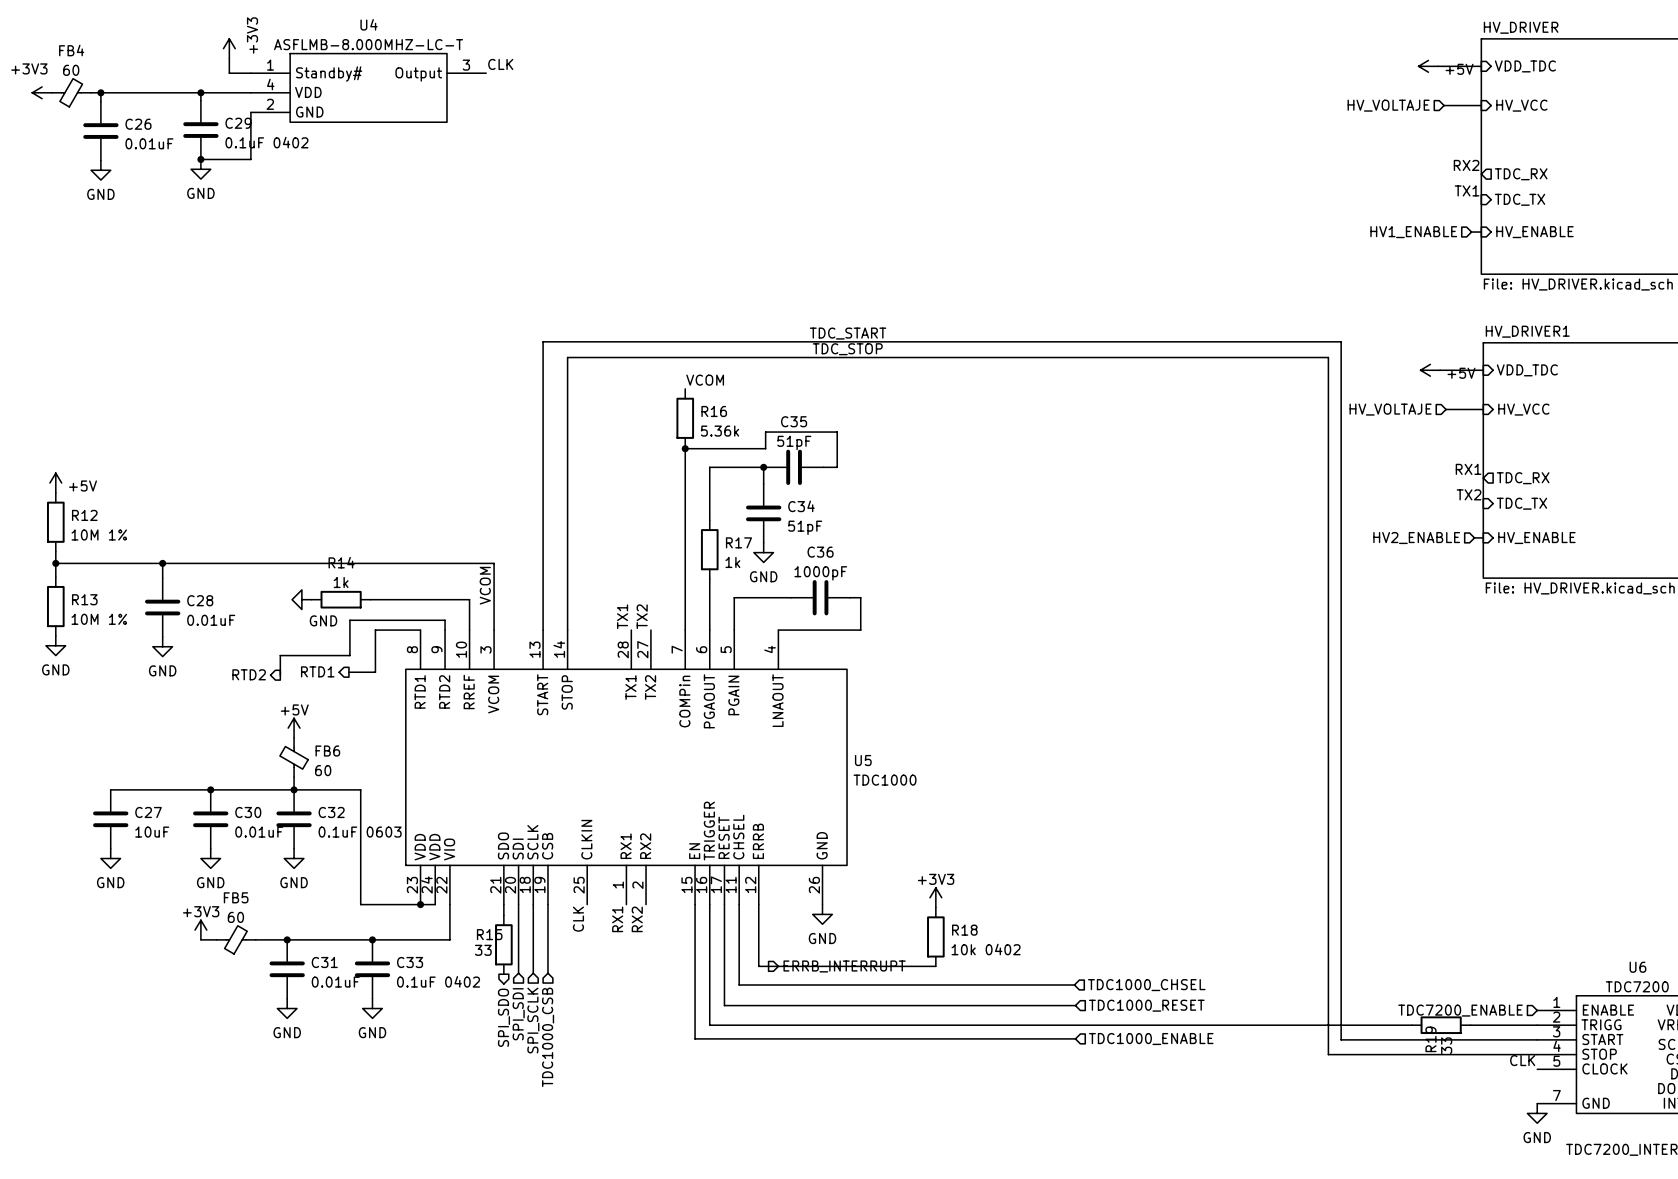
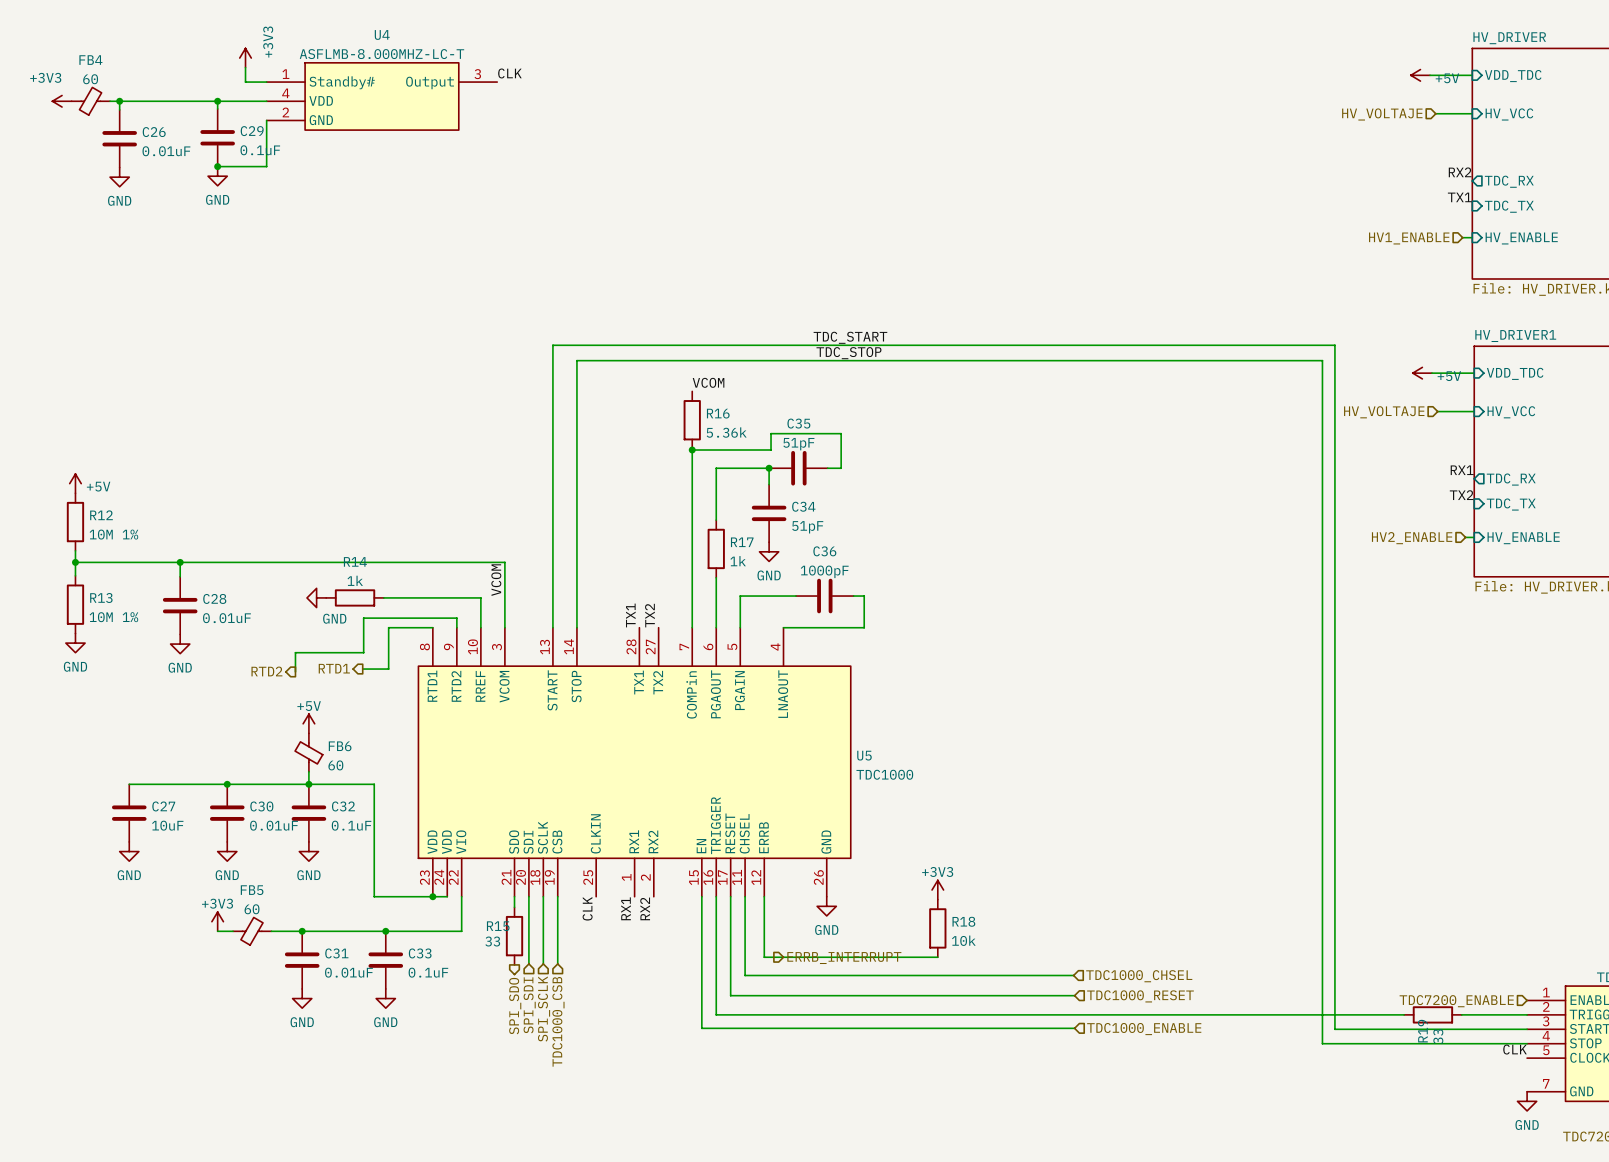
C29 value: 0.1uF 0402 (266, 142) -> 0.1uF (260, 150)
C32 value: 0.1uF 0603 (360, 832) -> 0.1uF (351, 825)
R18 value: 10k 0402 (986, 949) -> 10k (963, 940)
C33 value: 0.1uF 0402 (438, 981) -> 0.1uF (428, 972)

